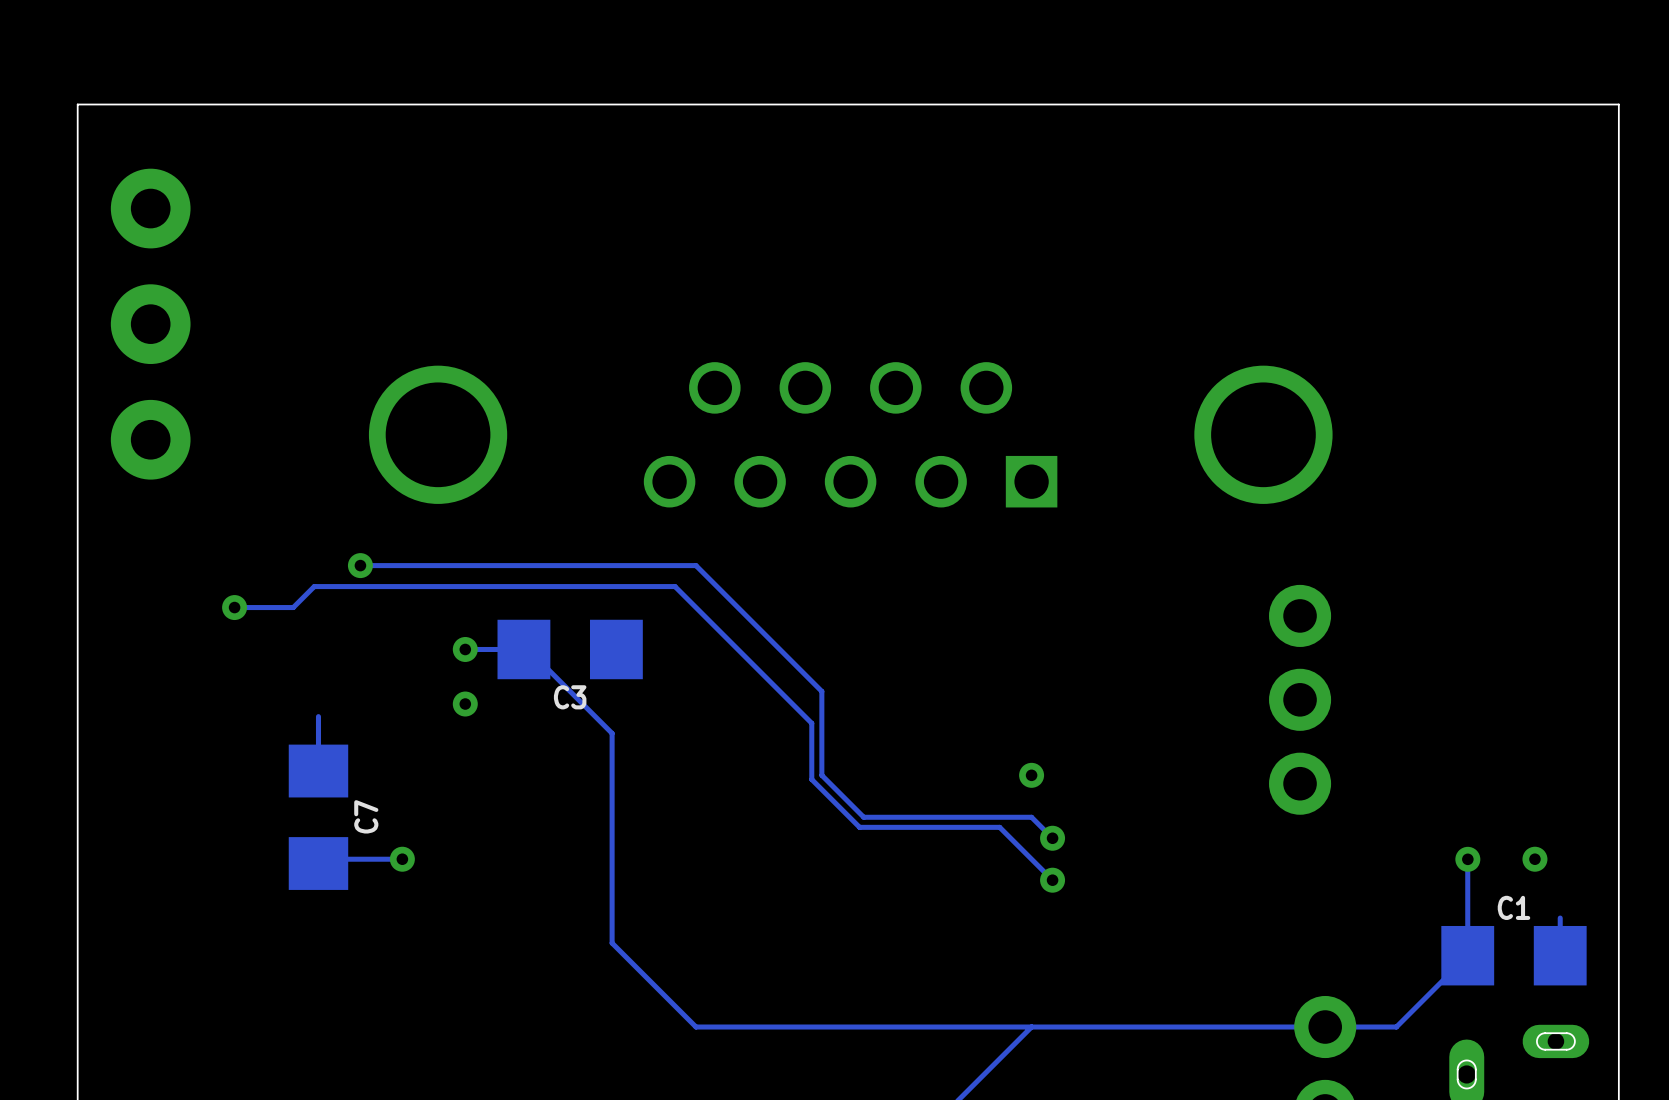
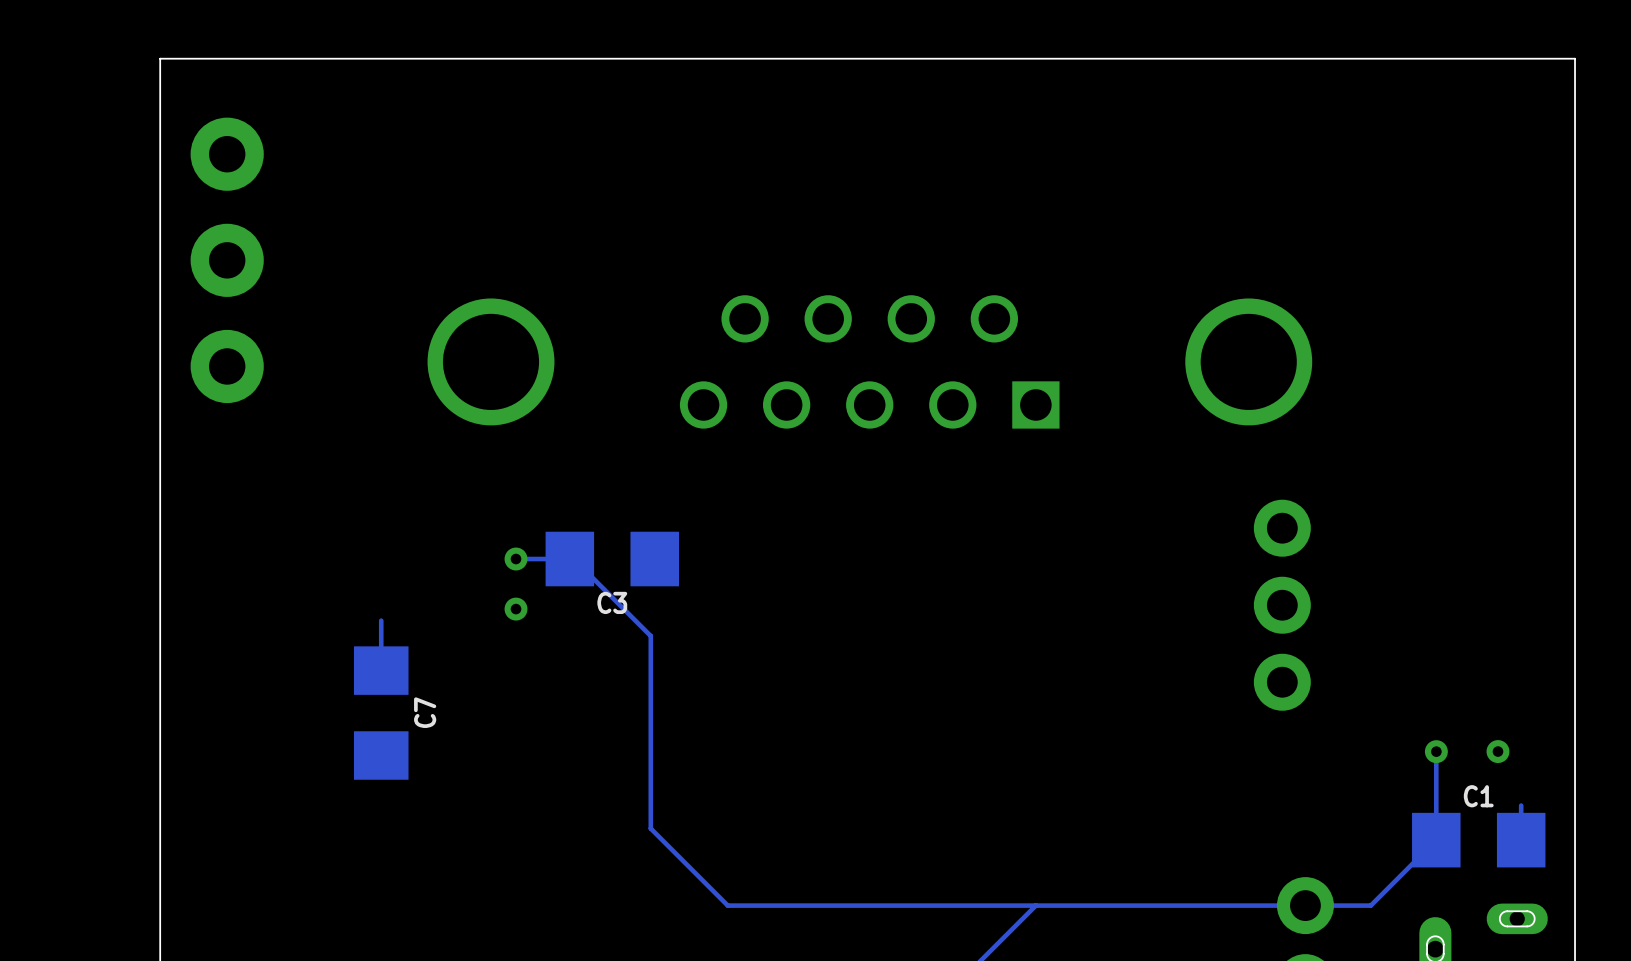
track: (360, 565) (696, 565) (821, 691) (821, 775) (863, 817) (1031, 817) (1052, 838) -> none
via: (360, 565) -> none
track: (234, 607) (293, 607) (314, 586) (675, 586) (811, 723) (811, 779) (859, 827) (999, 827) (1052, 880) -> none
via: (234, 607) -> none
via: (1031, 775) -> none
via: (1052, 838) -> none
track: (402, 859) (322, 859) (318, 863) -> none
via: (402, 859) -> none
via: (1052, 880) -> none

